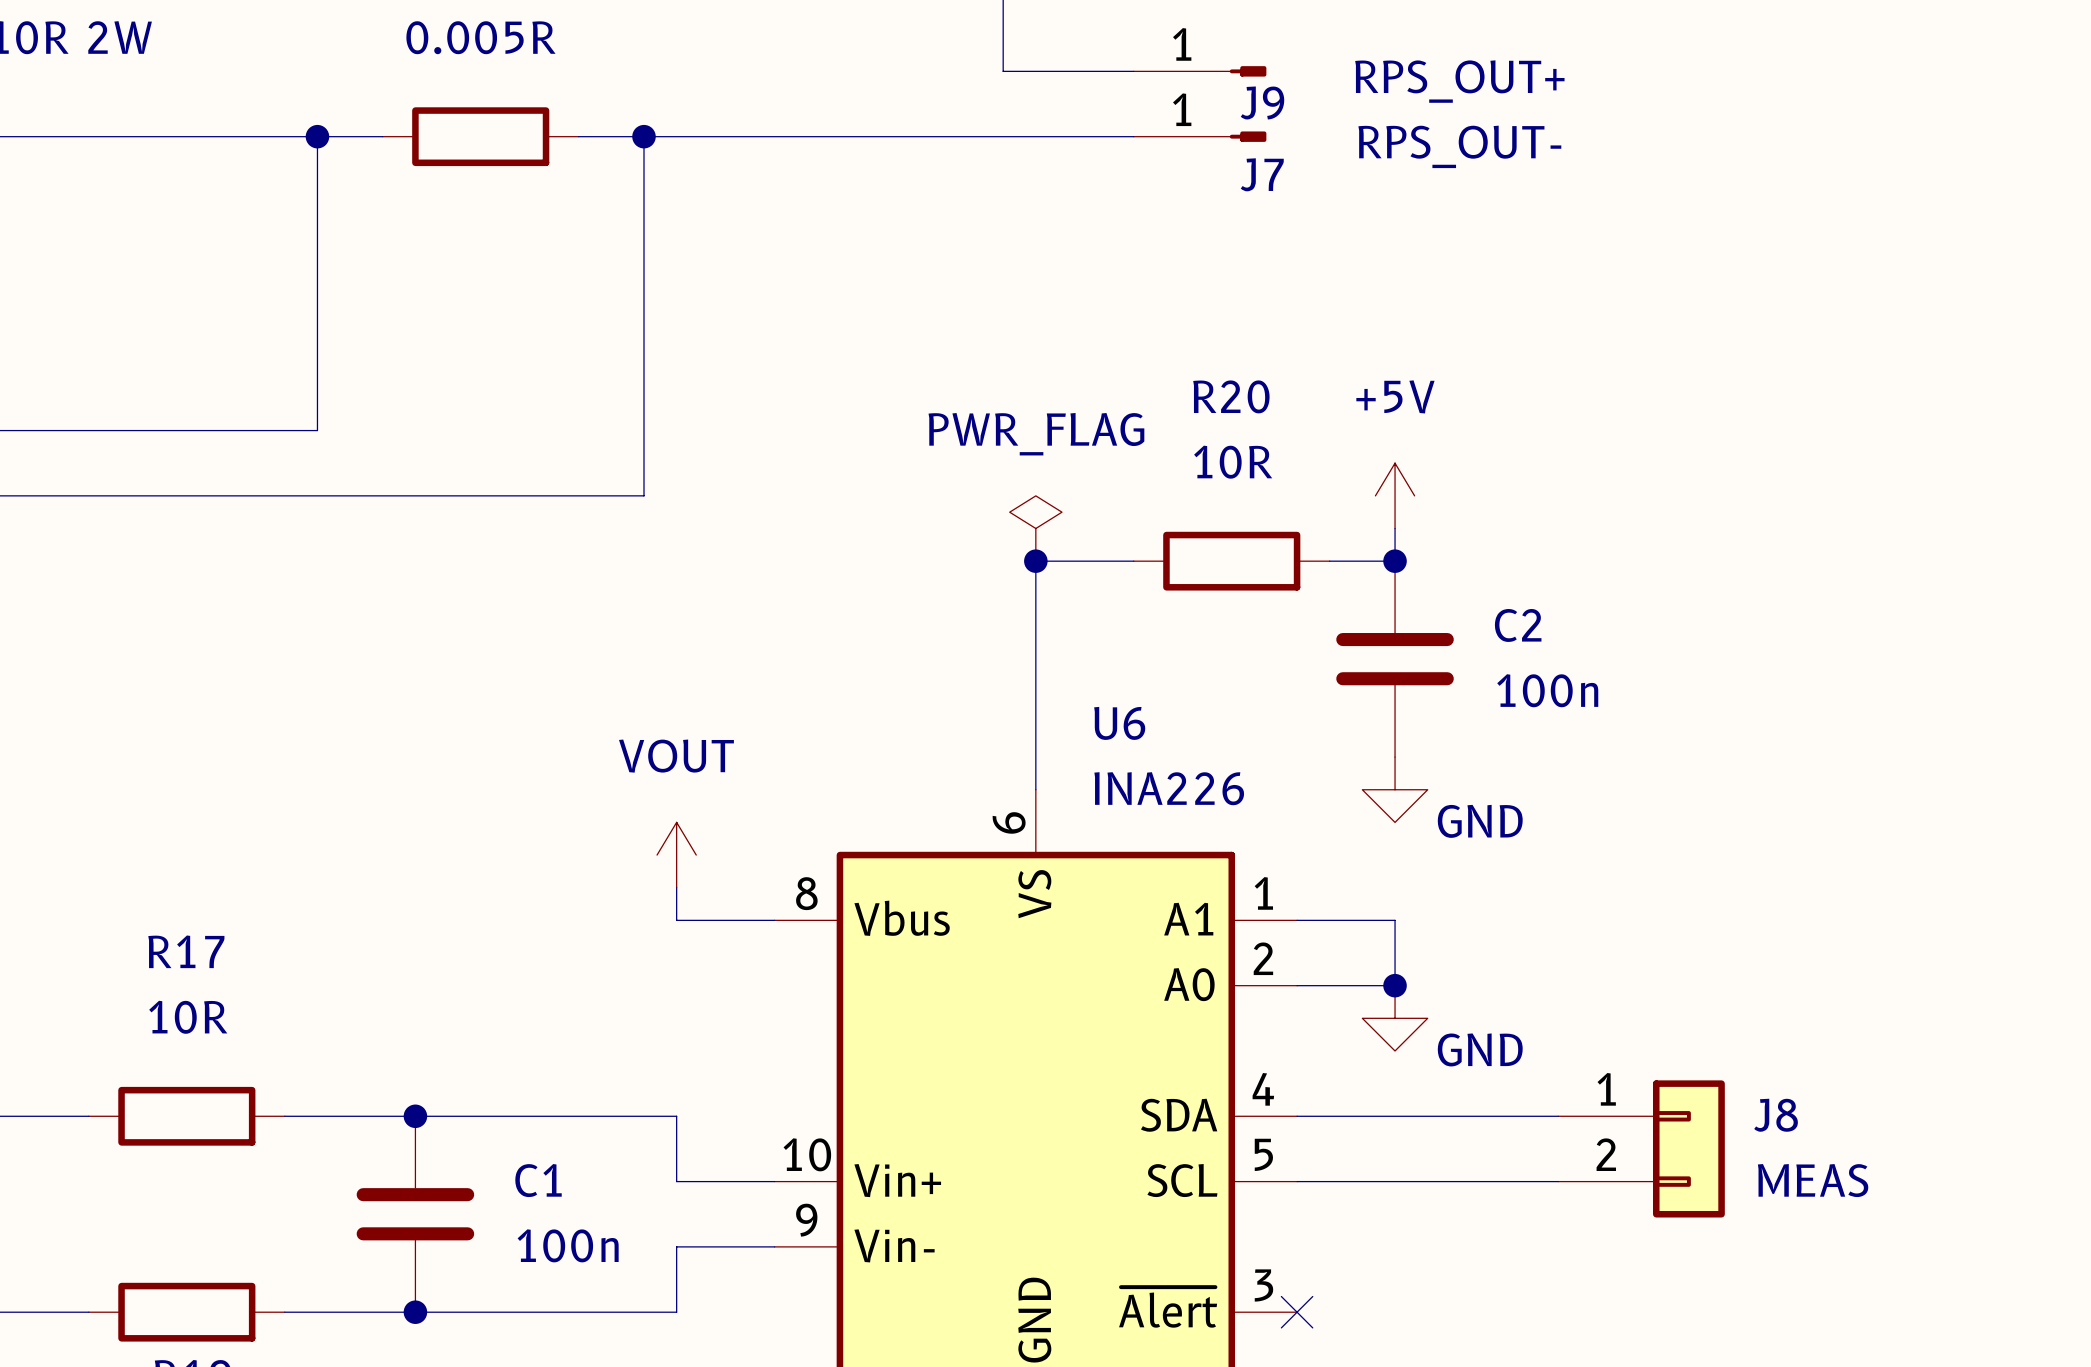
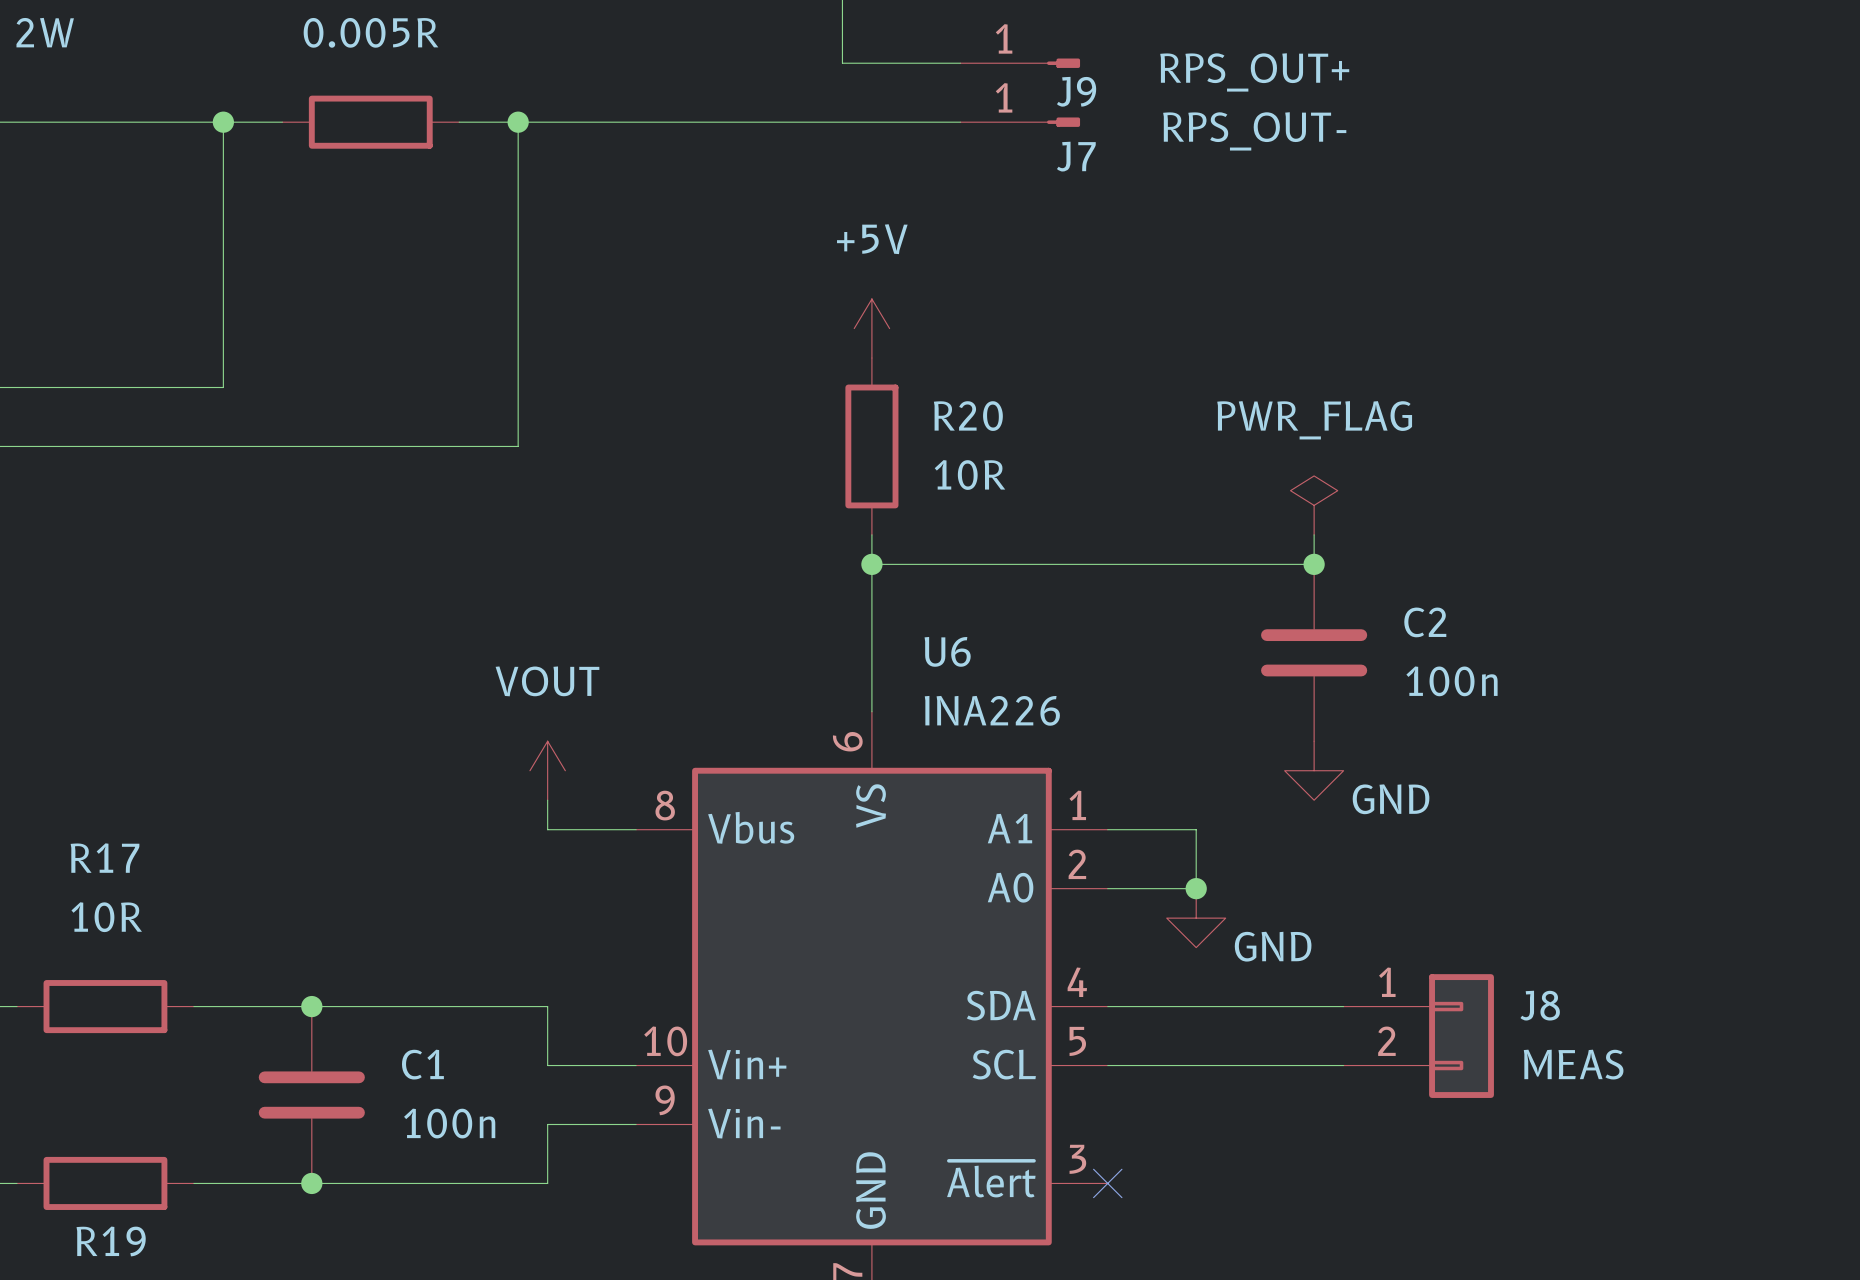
R20 name position: R20 (1231, 396) -> R20 (968, 416)
power symbol position: +5V (1395, 495) -> +5V (871, 328)
power symbol position: PWR_FLAG (1035, 528) -> PWR_FLAG (1314, 505)
wire: (1395, 528) (1395, 561) (1329, 561) -> none
junction position: (1035, 561) -> (871, 564)
wire: (1133, 561) (1035, 561) (1035, 593) -> none
R20 rotation: 0° (1231, 561) -> 90° clockwise (871, 446)
R20 position: (1231, 561) -> (871, 446)
junction position: (1395, 561) -> (1314, 564)
wire: none -> (1314, 534) (1314, 564) (871, 564)
C2 position: (1395, 659) -> (1314, 652)
power symbol position: GND (1395, 789) -> GND (1314, 770)

